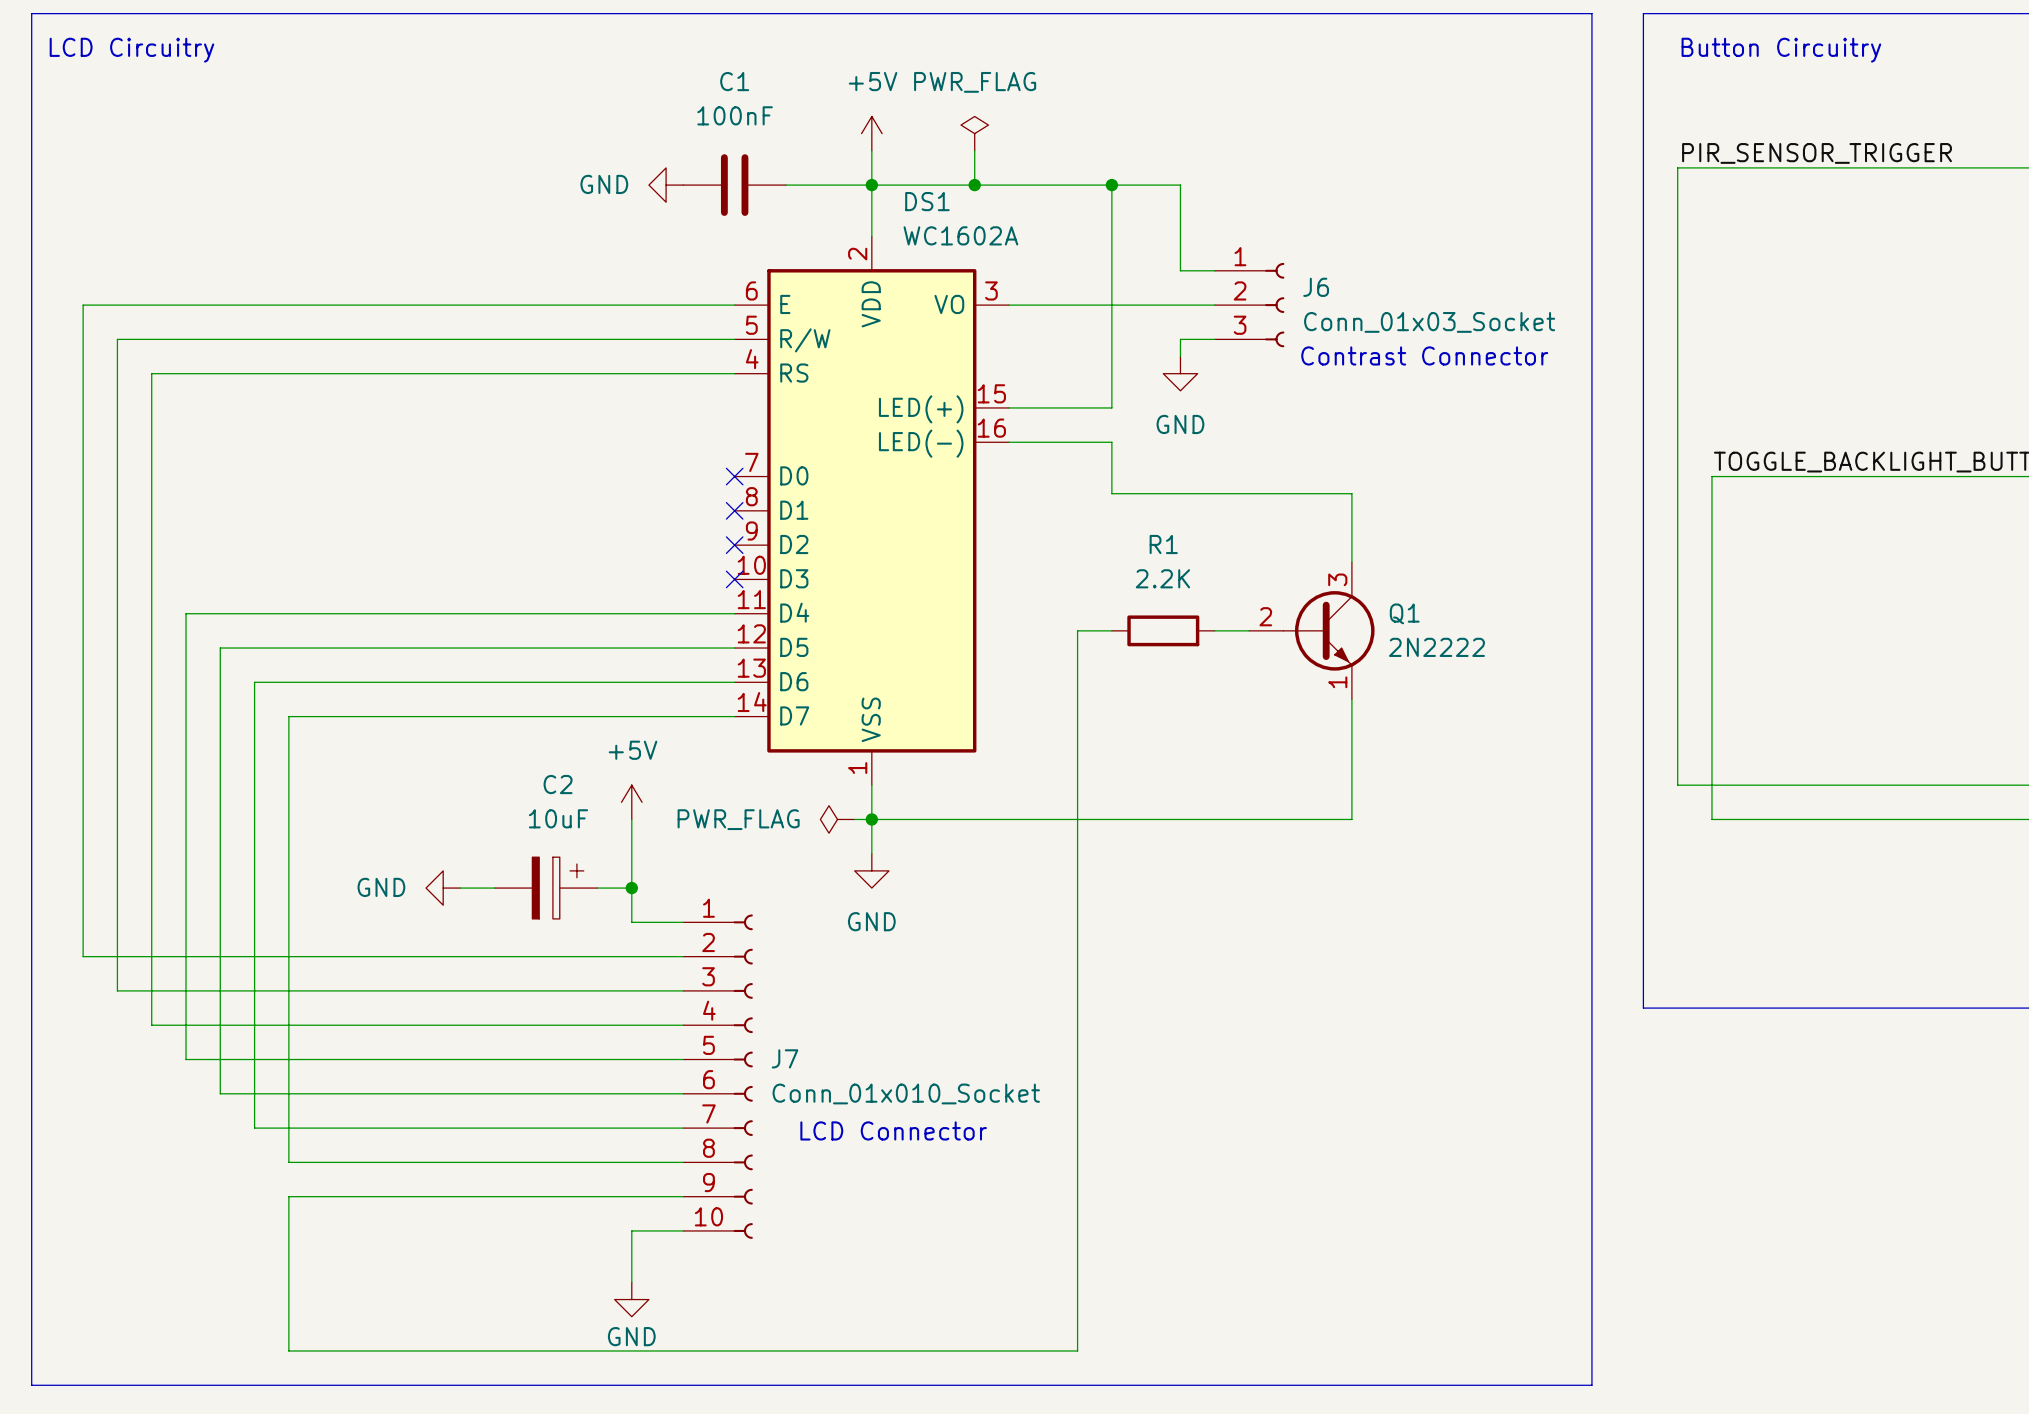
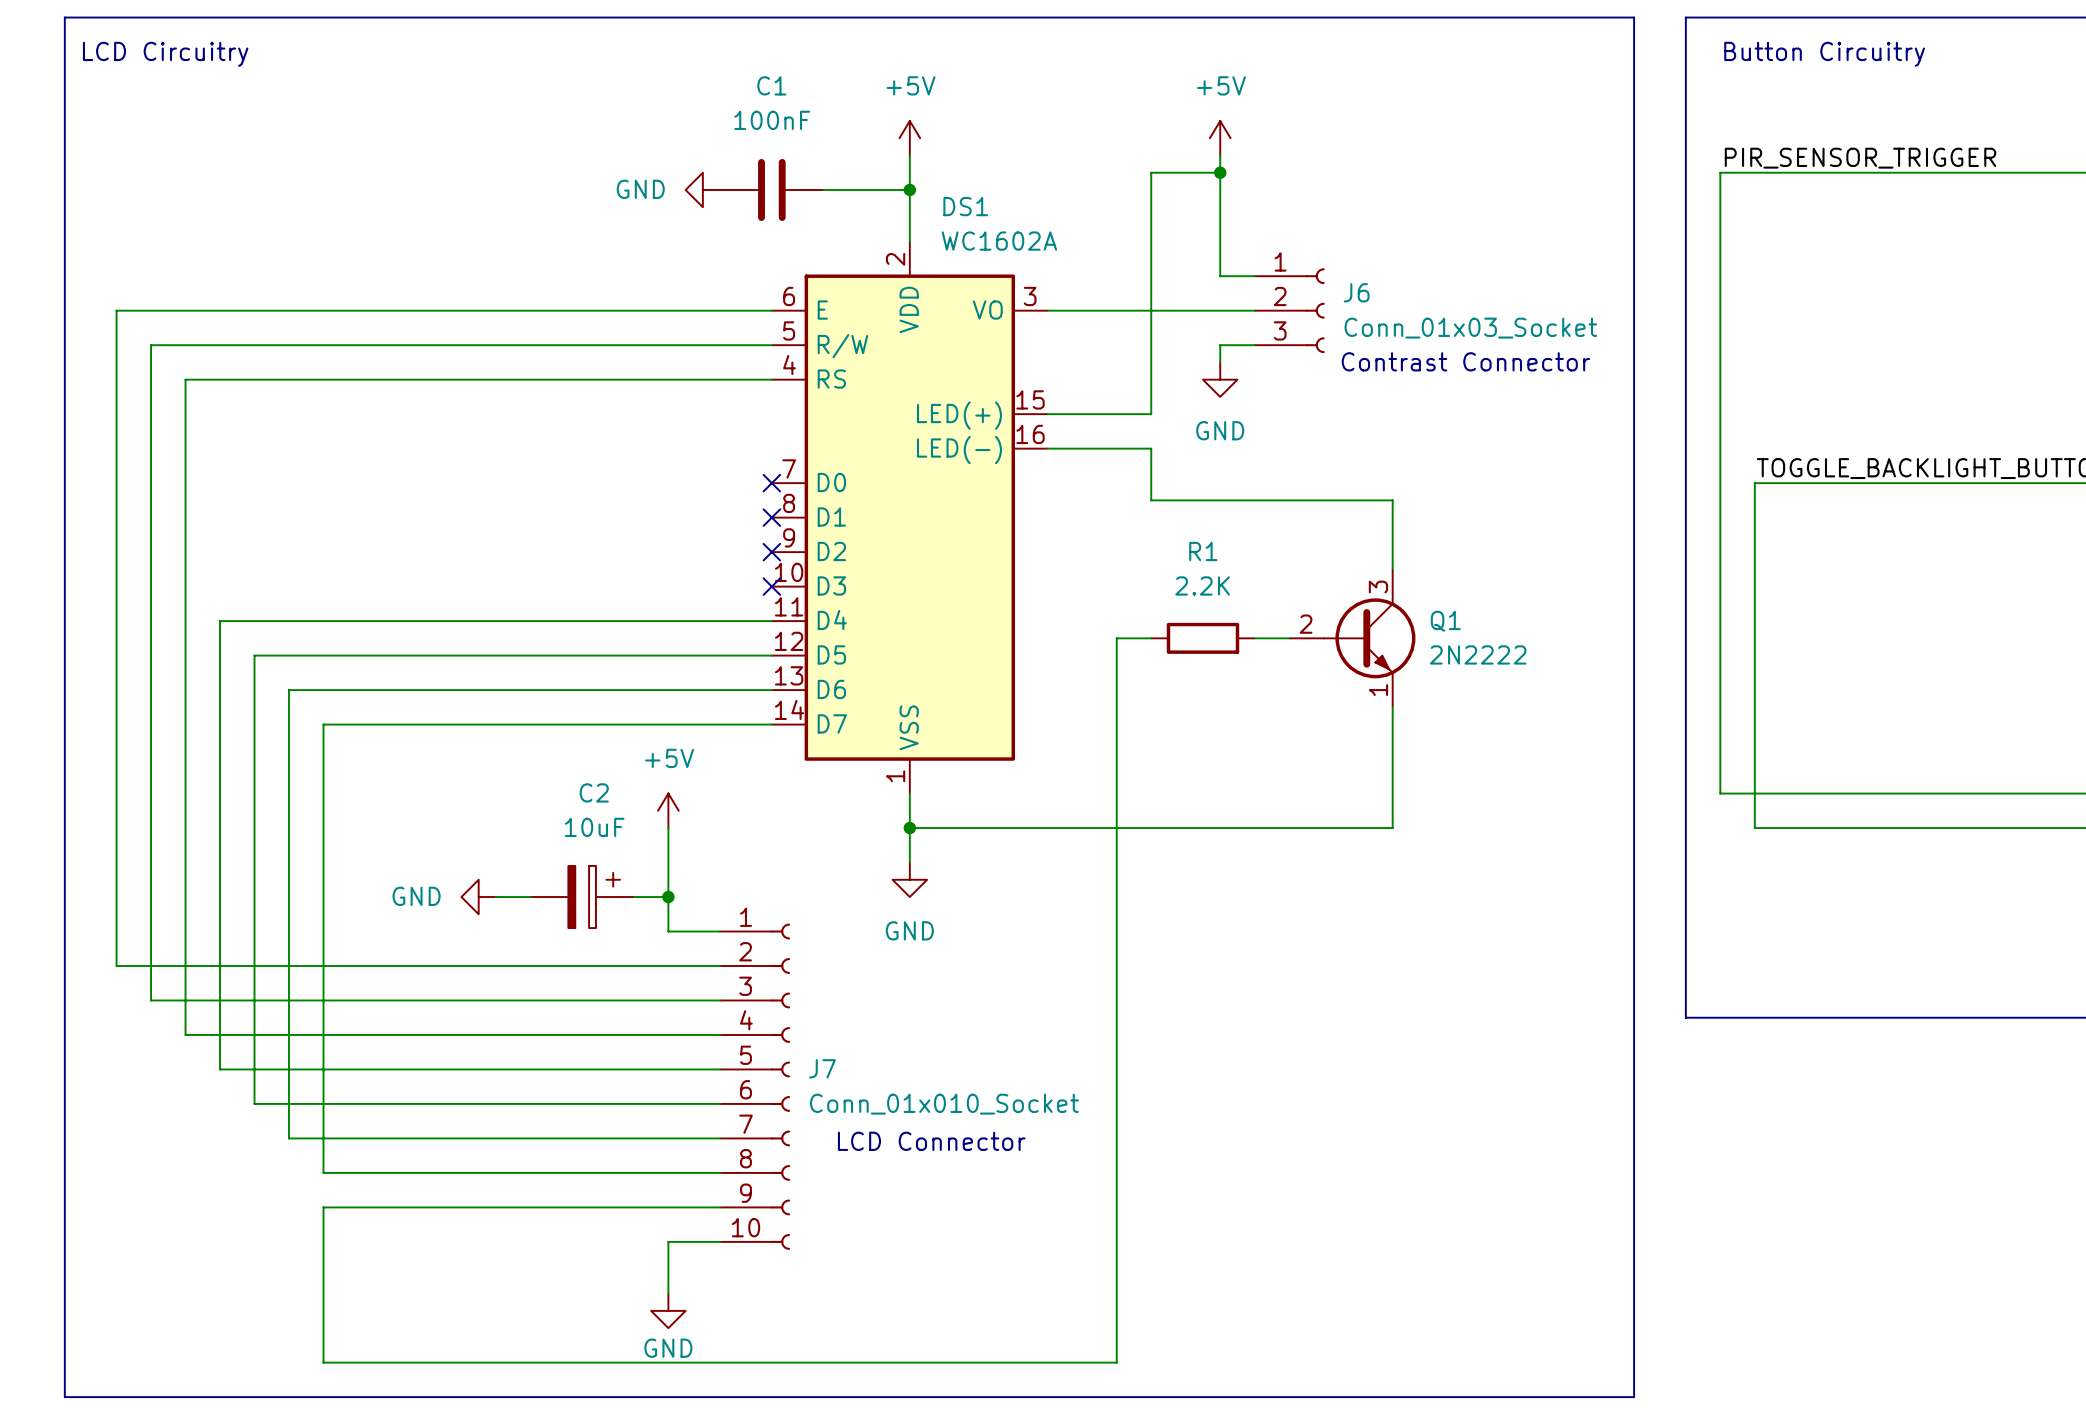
power symbol: PWR_FLAG (974, 133) -> none
power symbol: none -> +5V (1220, 138)
wire: (974, 150) (974, 185) -> none
wire: none -> (1220, 172) (1151, 172) (1151, 189)
wire: (871, 185) (1180, 185) -> (1220, 155) (1220, 189)
junction: (974, 185) -> none
junction position: (1111, 185) -> (1220, 172)
power symbol: PWR_FLAG (837, 819) -> none
wire: (854, 819) (871, 819) -> none

